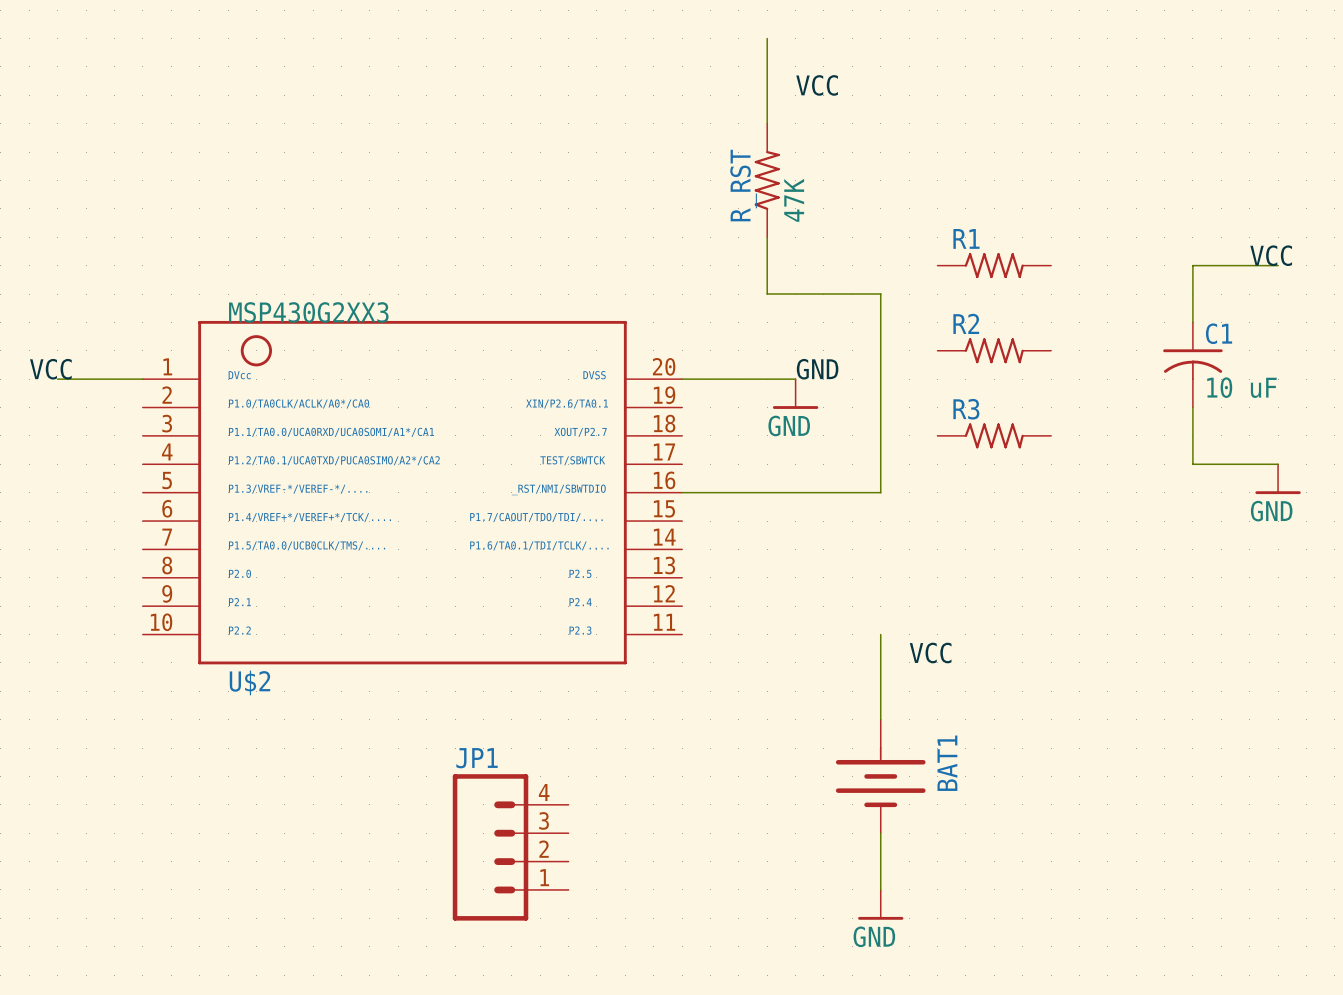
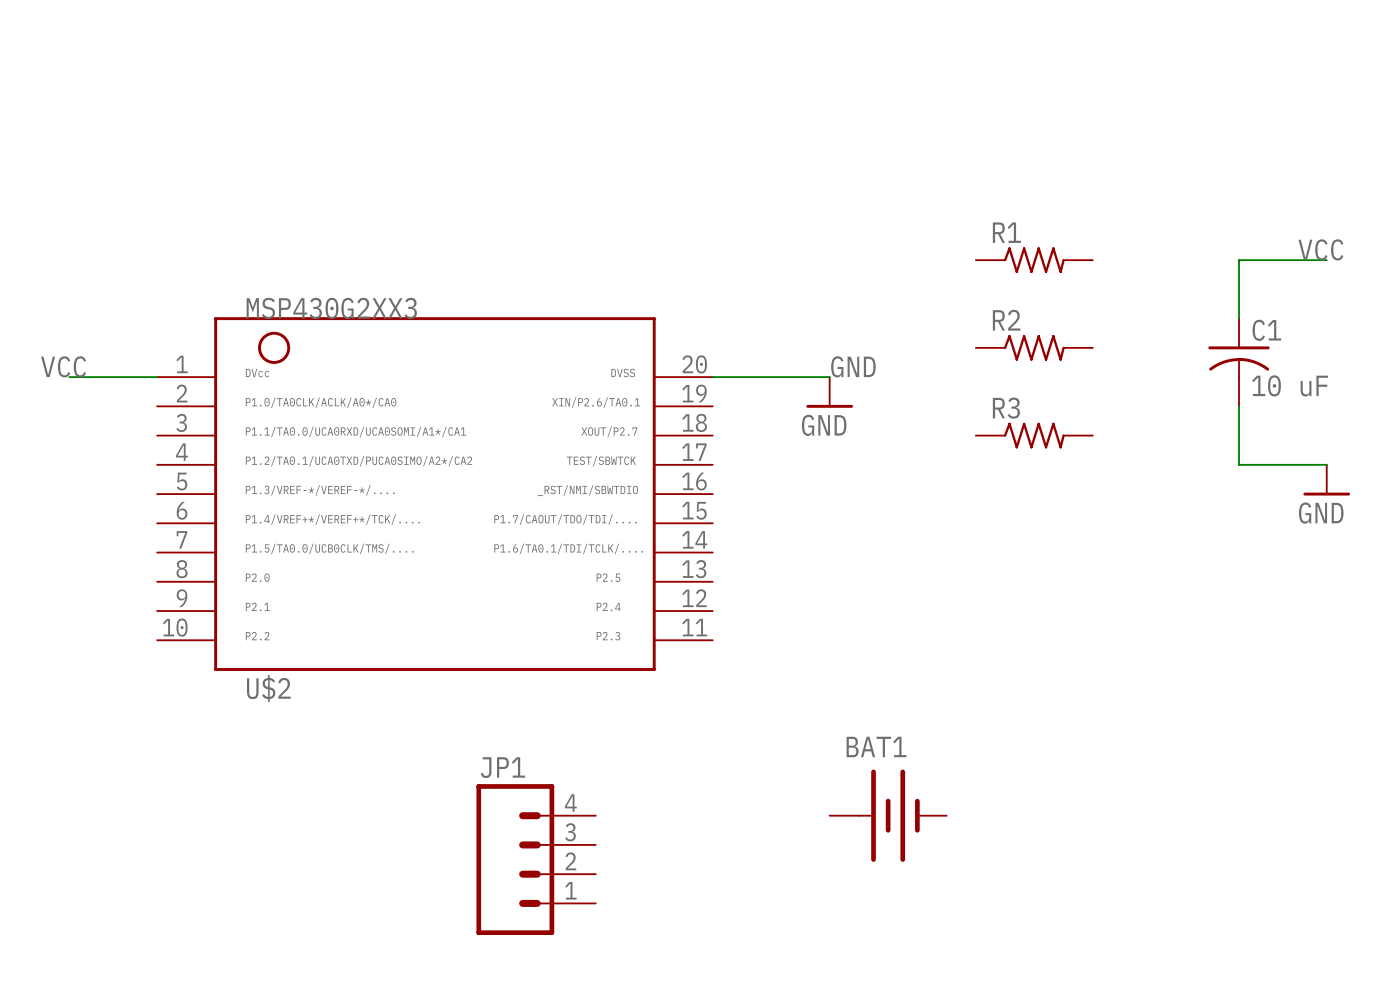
wire: (767, 38) (767, 123) -> none
label: VCC (817, 85) -> none
R_RST: 47K (767, 180) -> none
wire: (767, 237) (767, 294) (880, 294) (880, 492) (682, 492) -> none
wire: (880, 634) (880, 719) -> none
label: VCC (930, 653) -> none
BAT1 rotation: 0° (880, 777) -> 90° counterclockwise (888, 815)
wire: (880, 833) (880, 889) -> none
power symbol: GND (880, 904) -> none

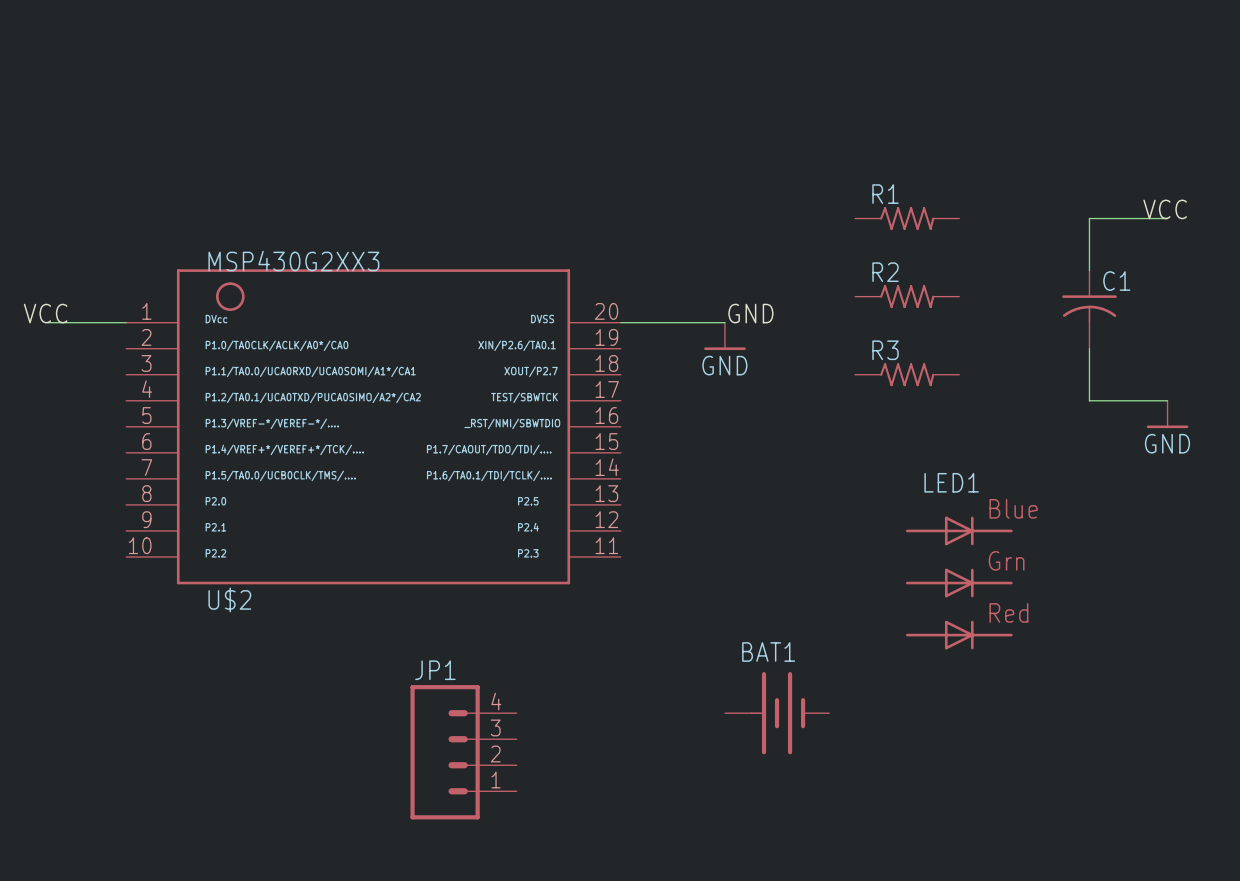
C1 value: 10 uF (1290, 385) -> none
LED1: none -> (959, 583)

